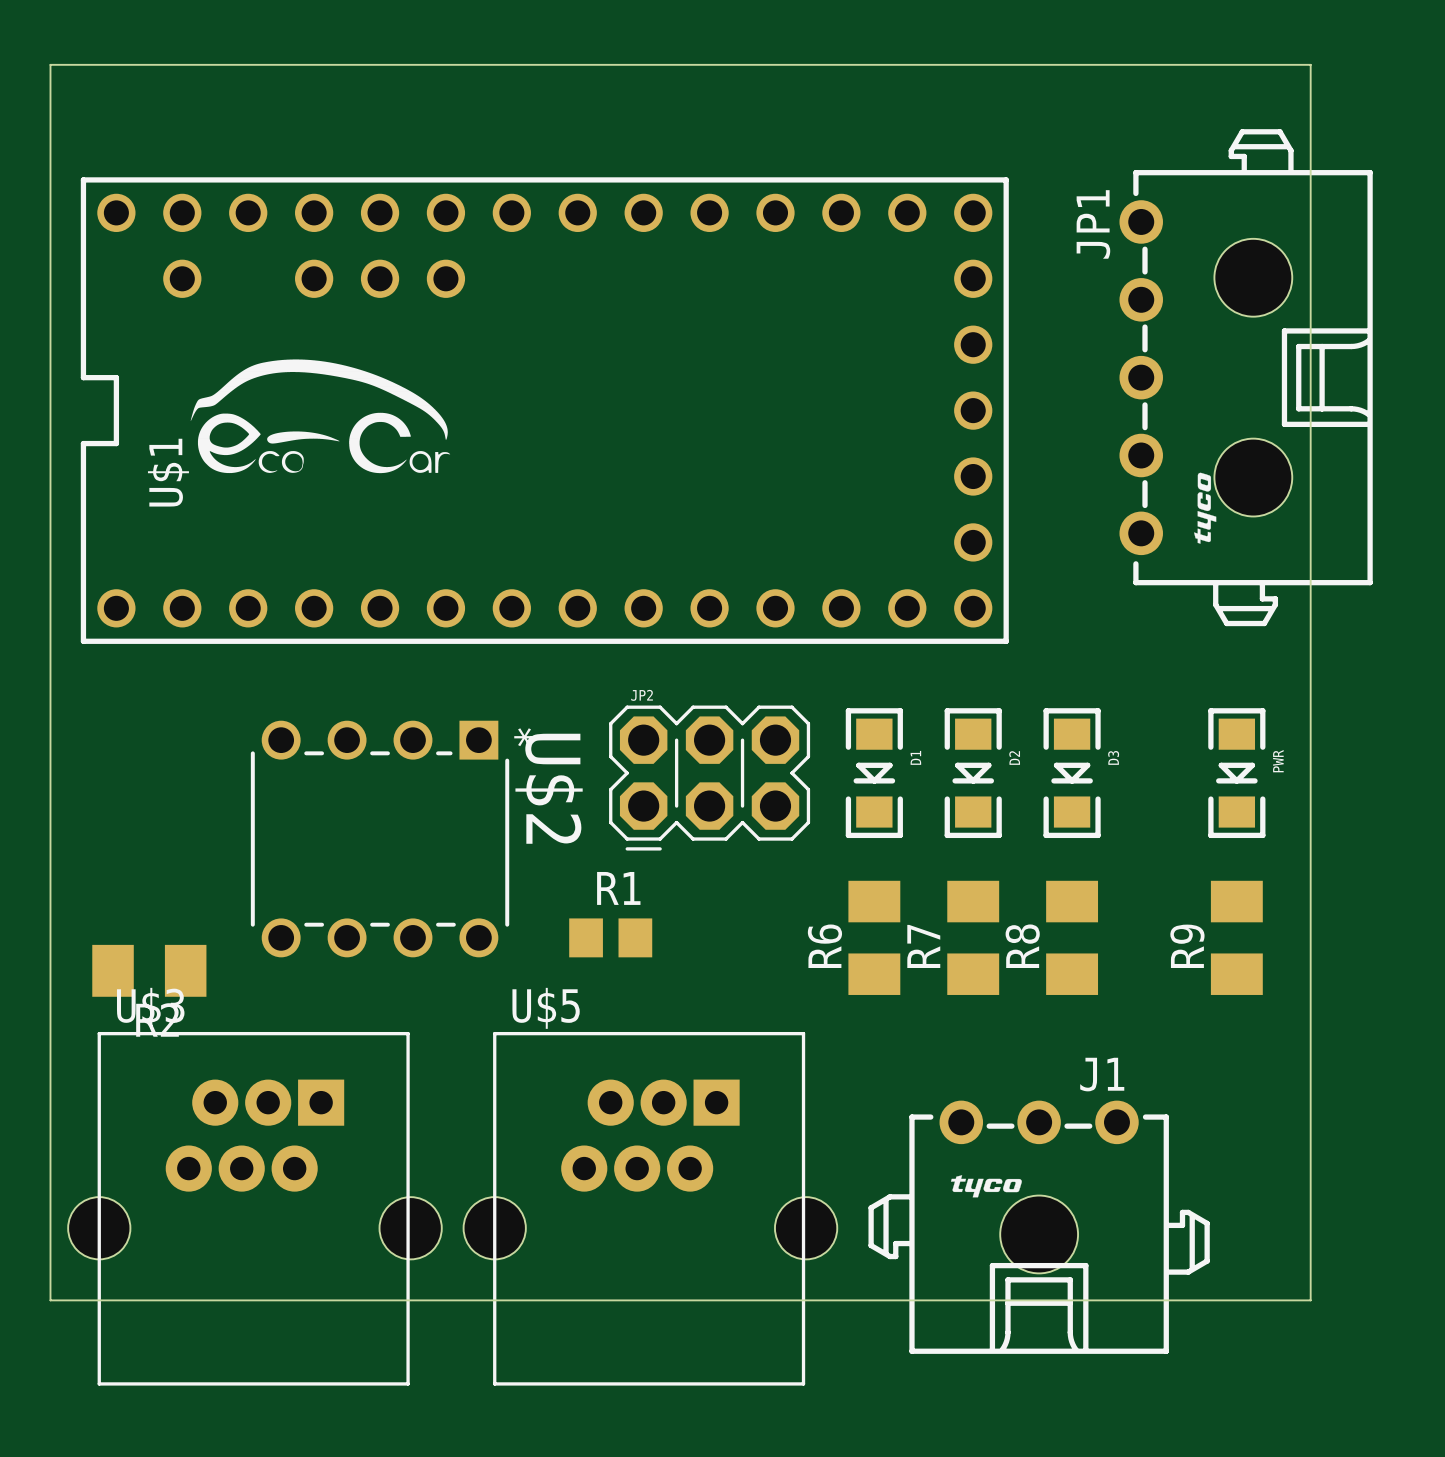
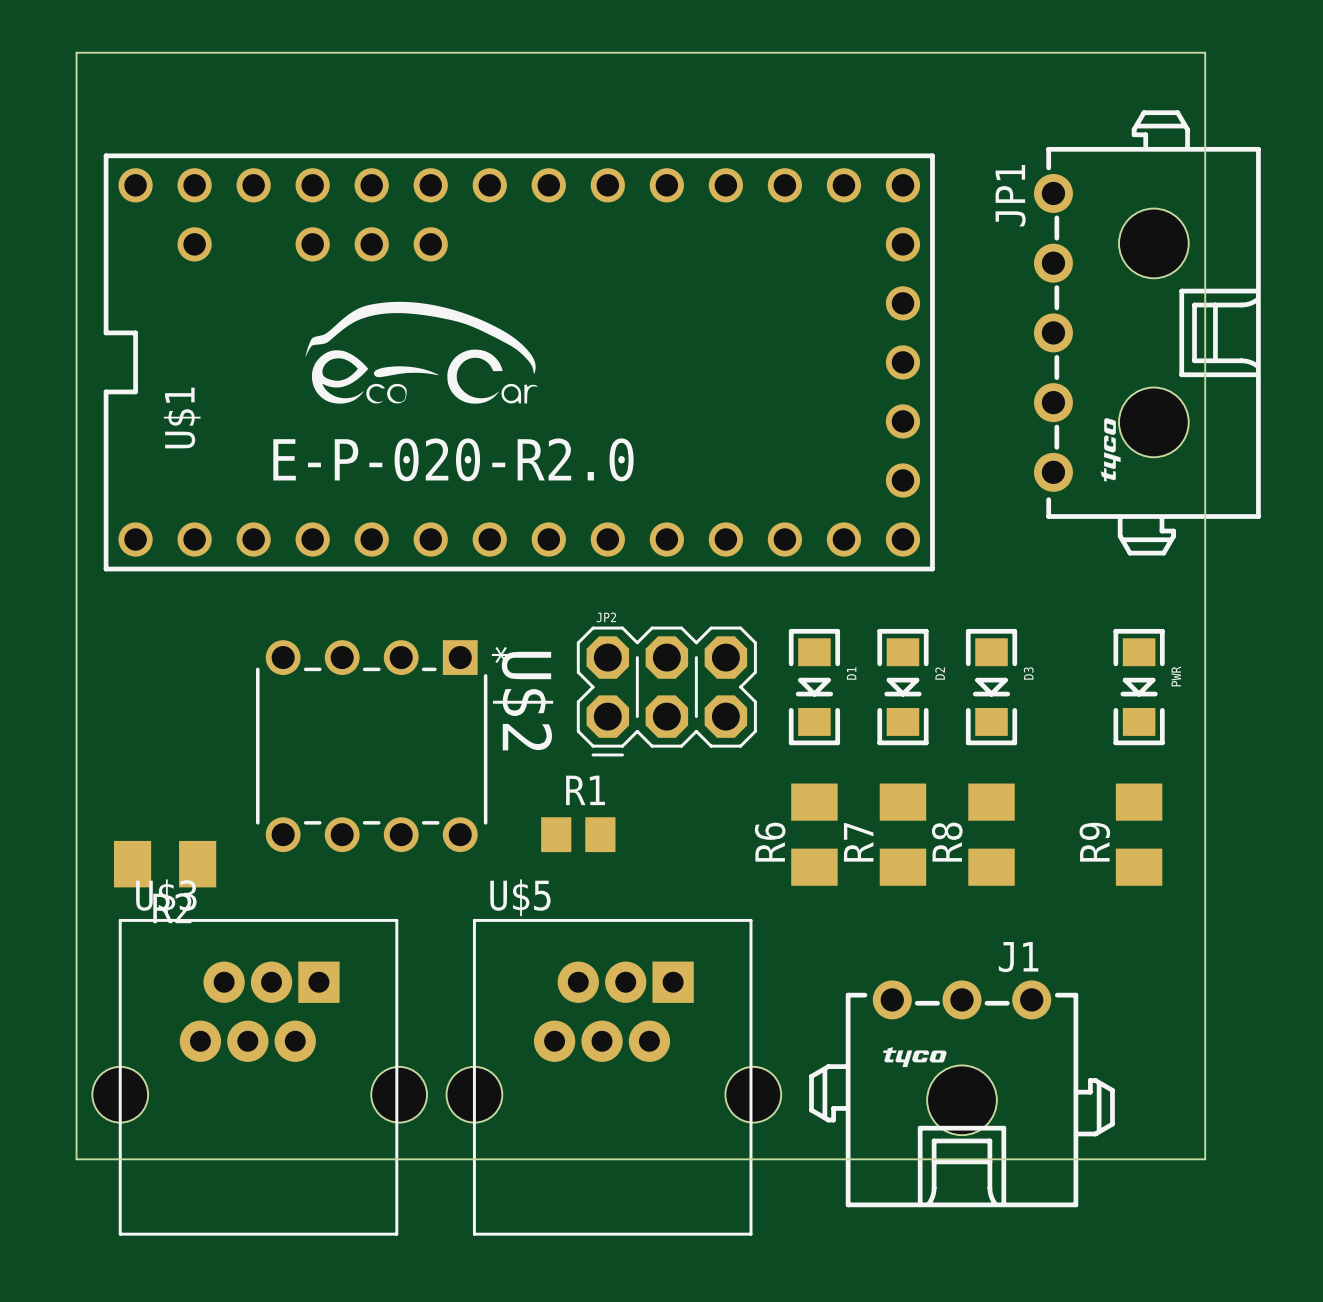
drawing position: (320, 416) -> (421, 352)
text: none -> E-P-020-R2.0 (453, 459)

